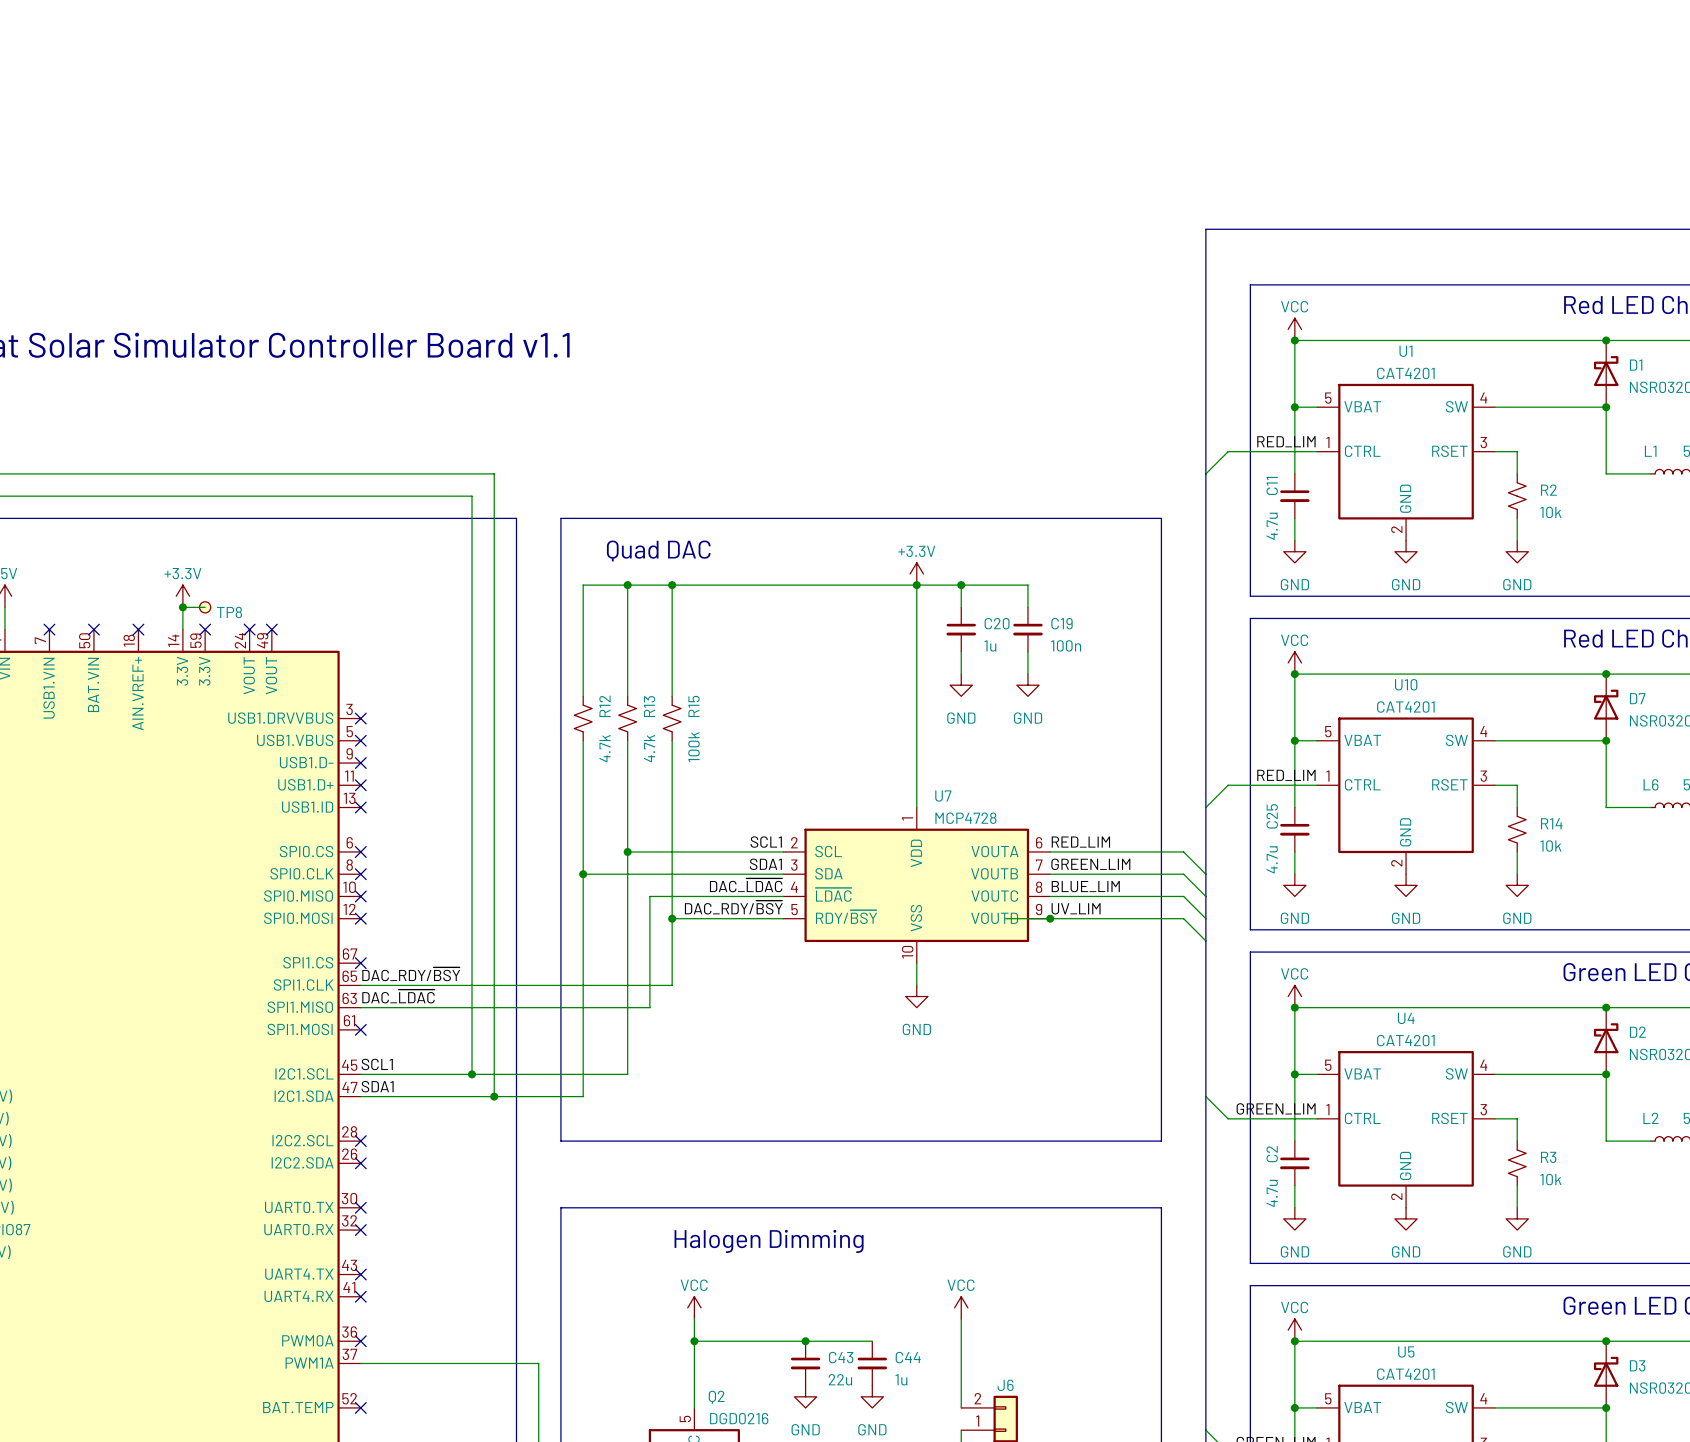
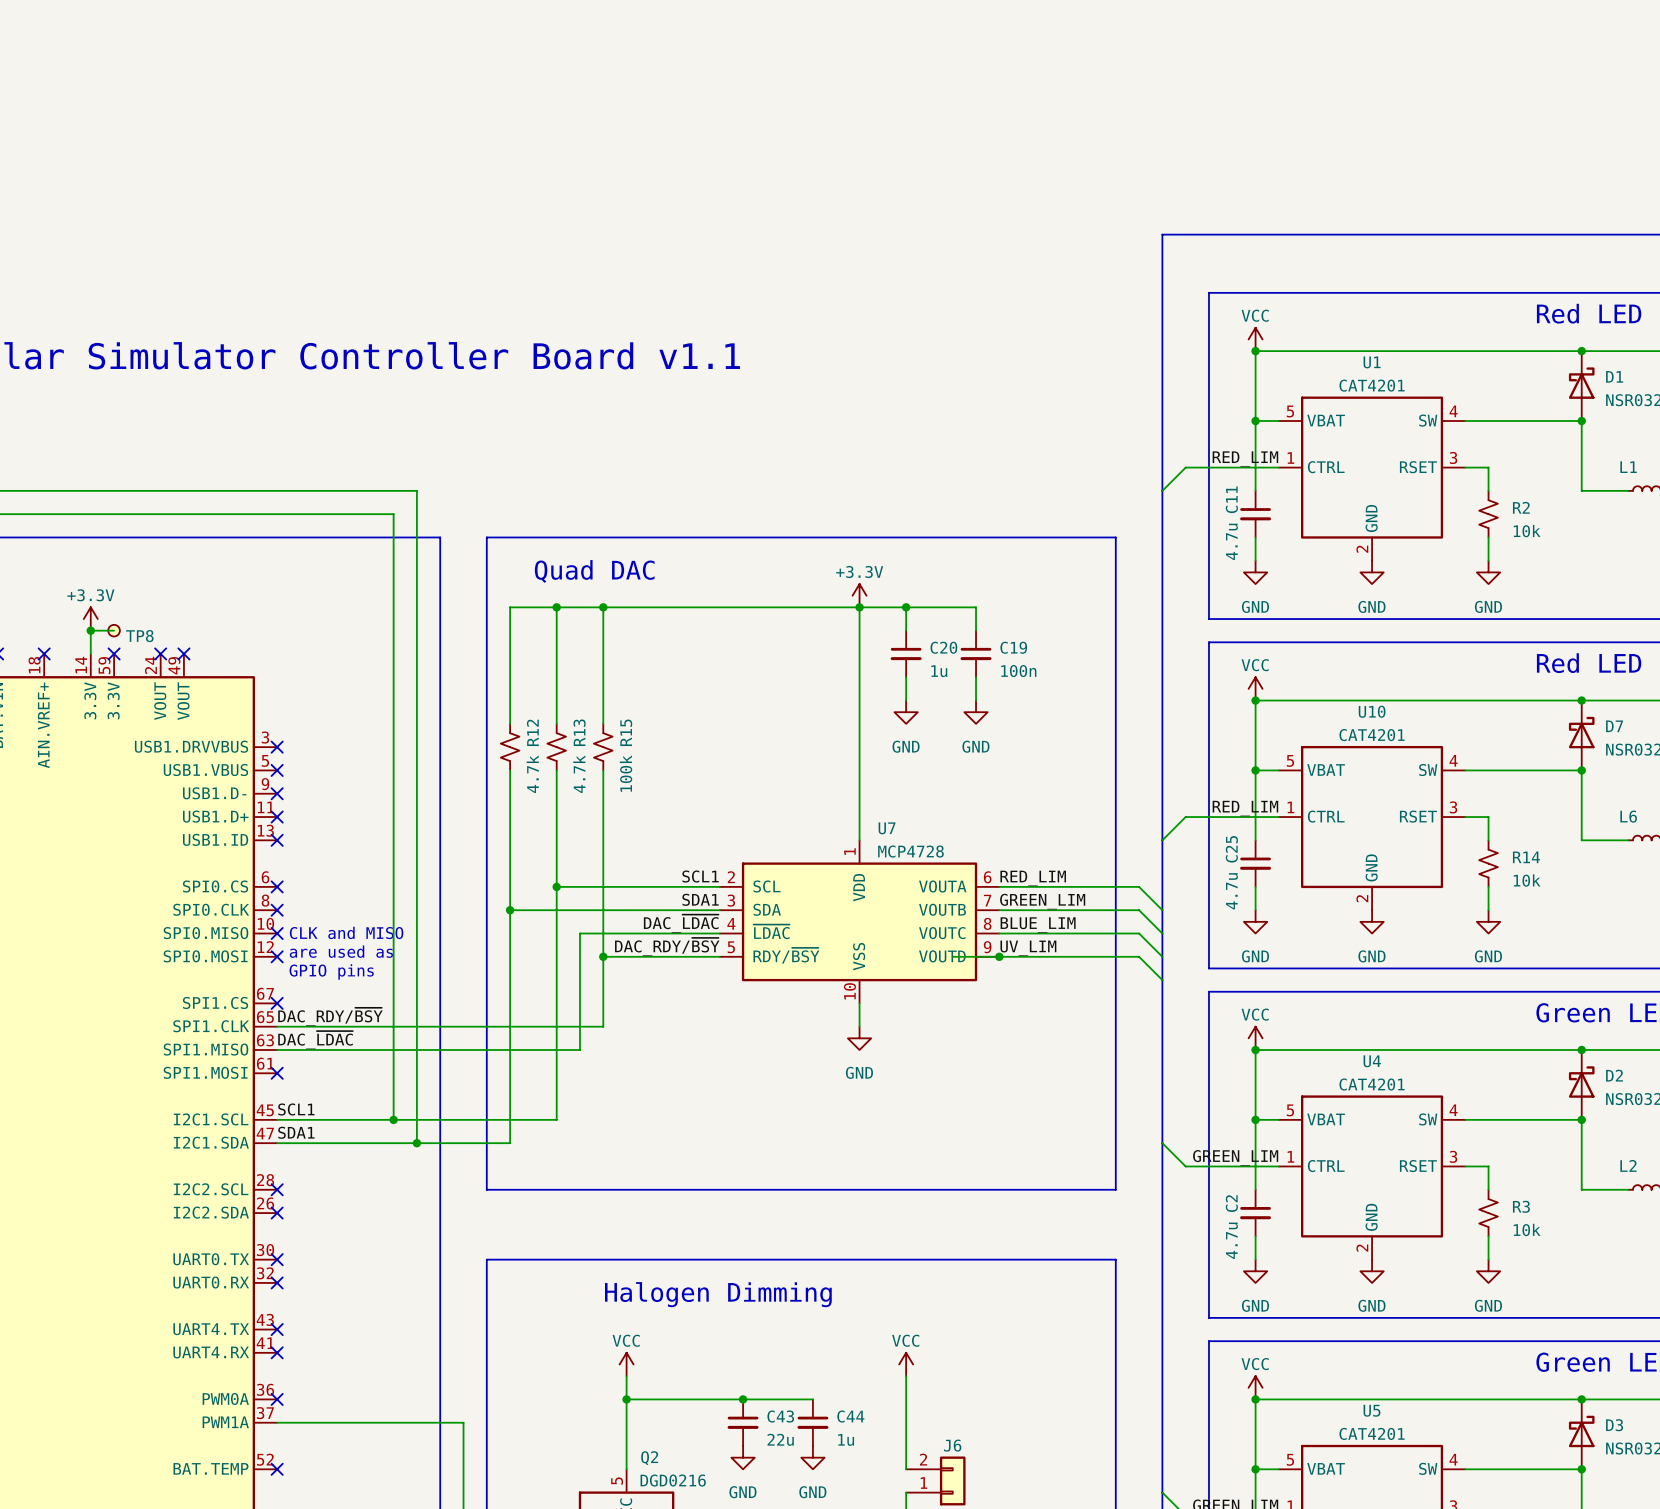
text: none -> CLK and MISO (346, 932)
text: none -> are used as (341, 951)
text: none -> GPIO pins (331, 971)

